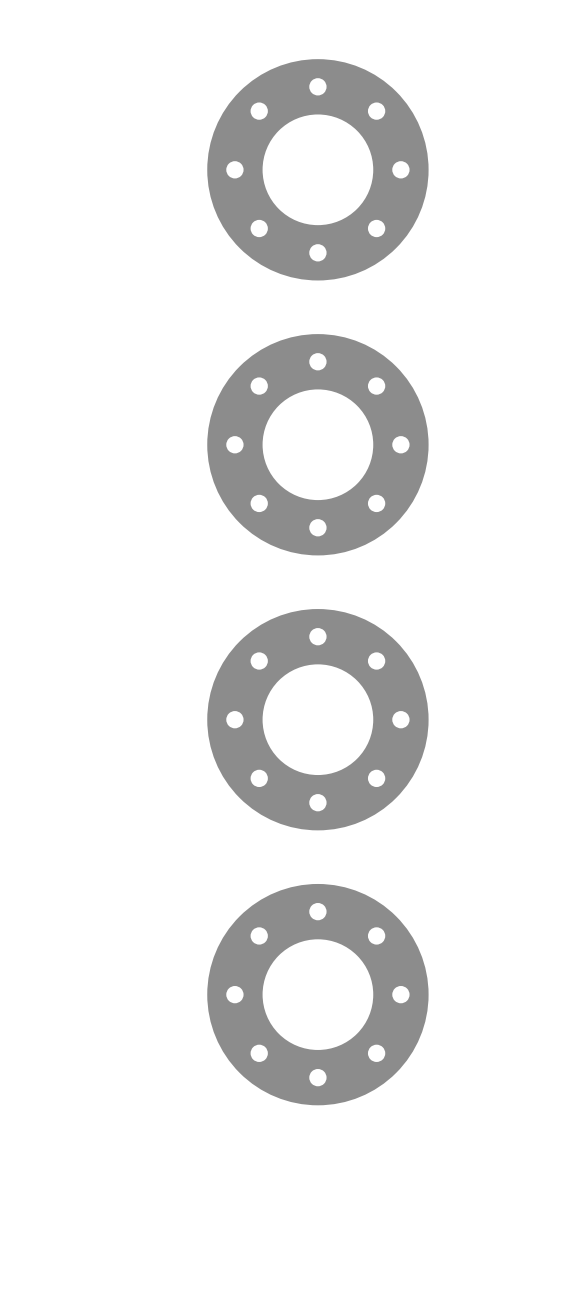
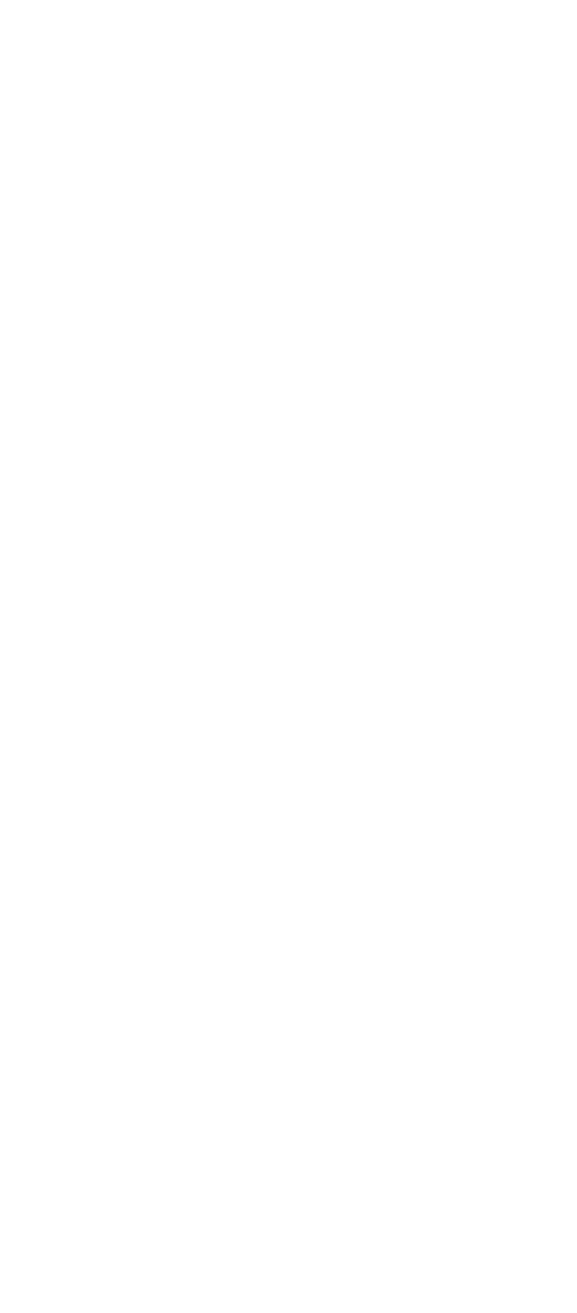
part: (317, 169) -> none
part: (317, 444) -> none
part: (317, 719) -> none
part: (317, 994) -> none

